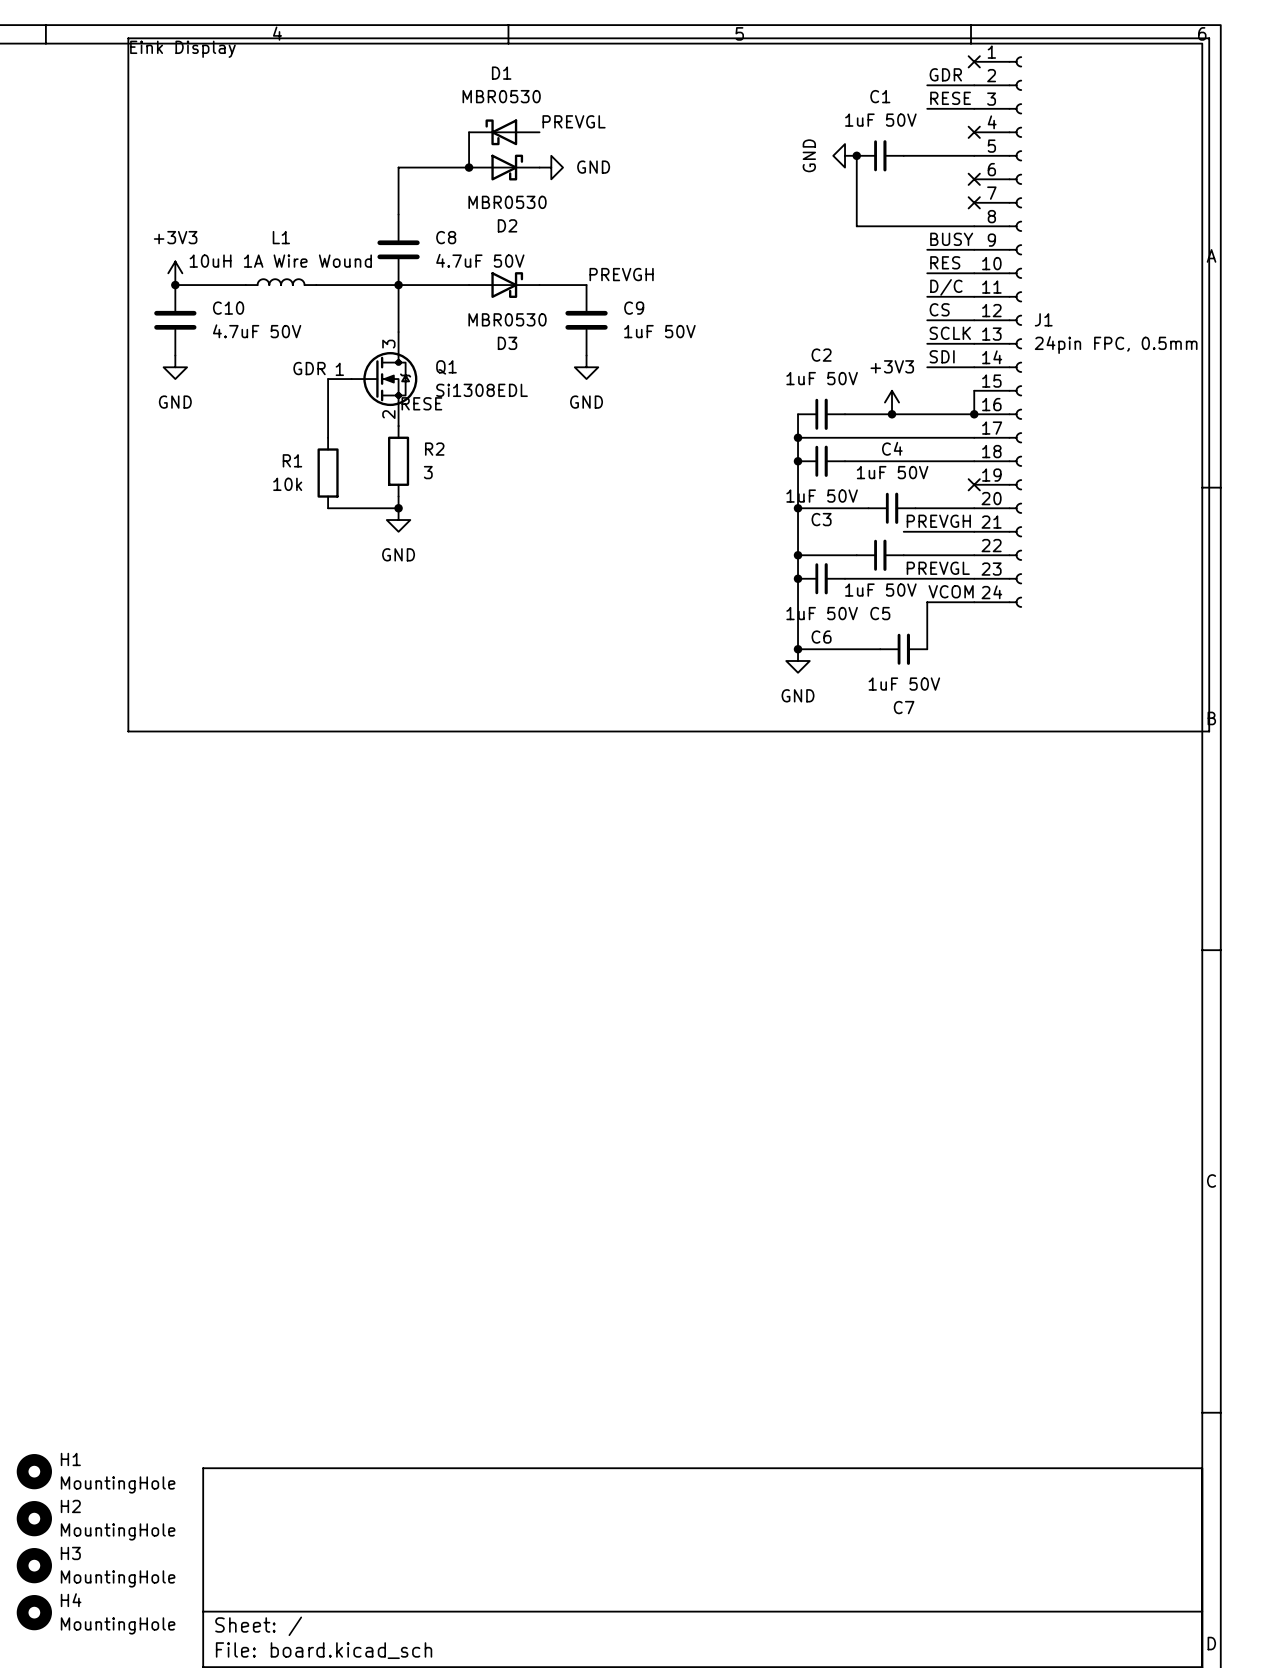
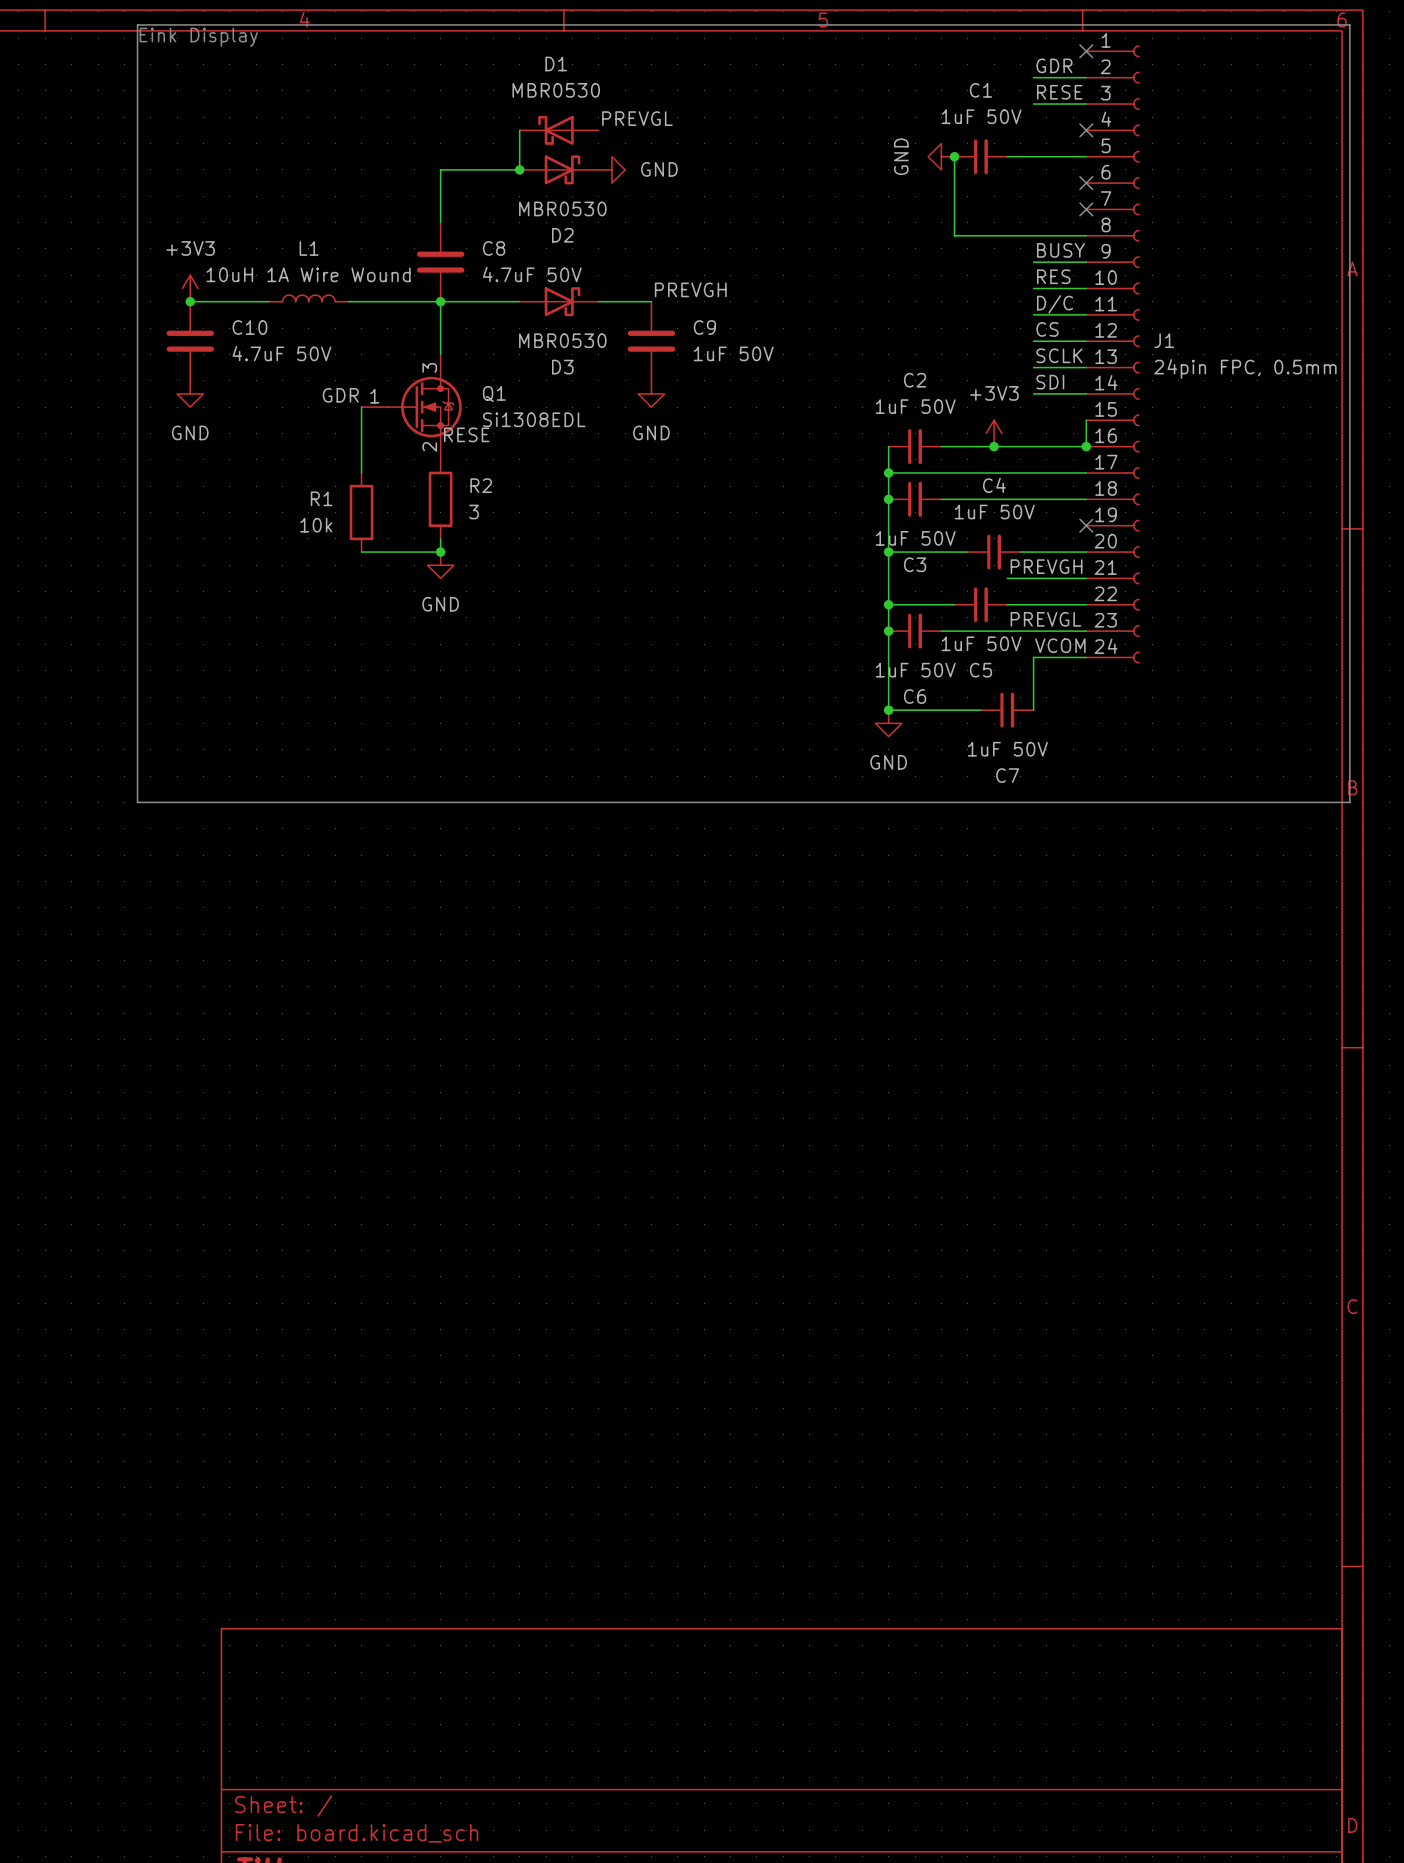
H1: MountingHole (34, 1471) -> none
H2: MountingHole (34, 1518) -> none
H3: MountingHole (34, 1565) -> none
H4: MountingHole (34, 1612) -> none

